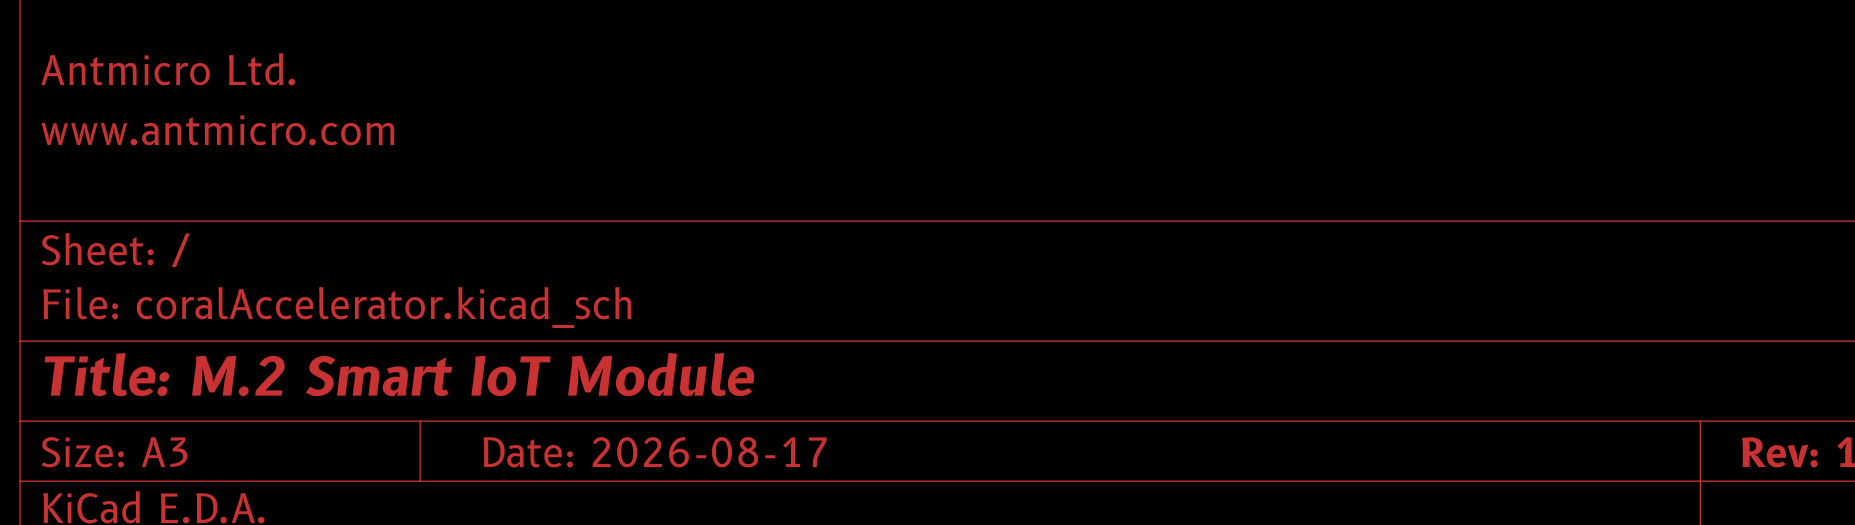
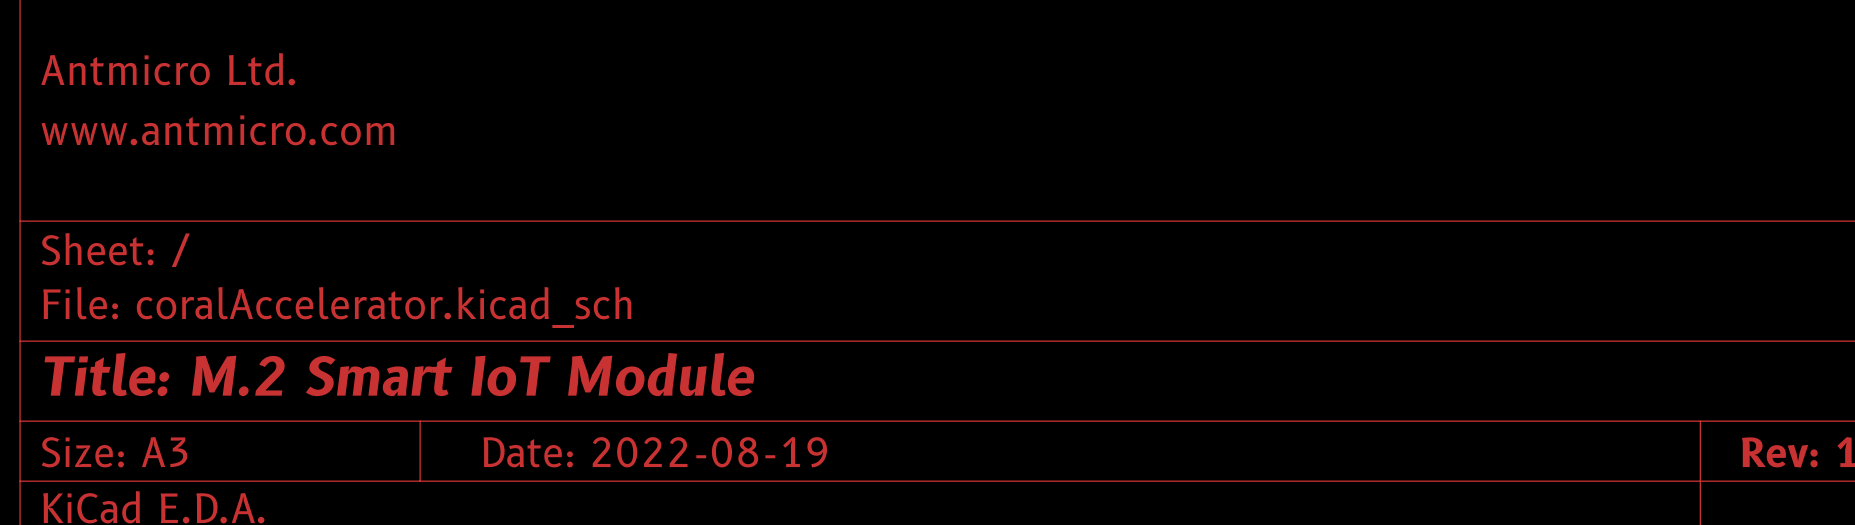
title block: Date: 2026-08-17 (655, 452) -> Date: 2022-08-19 (655, 452)

